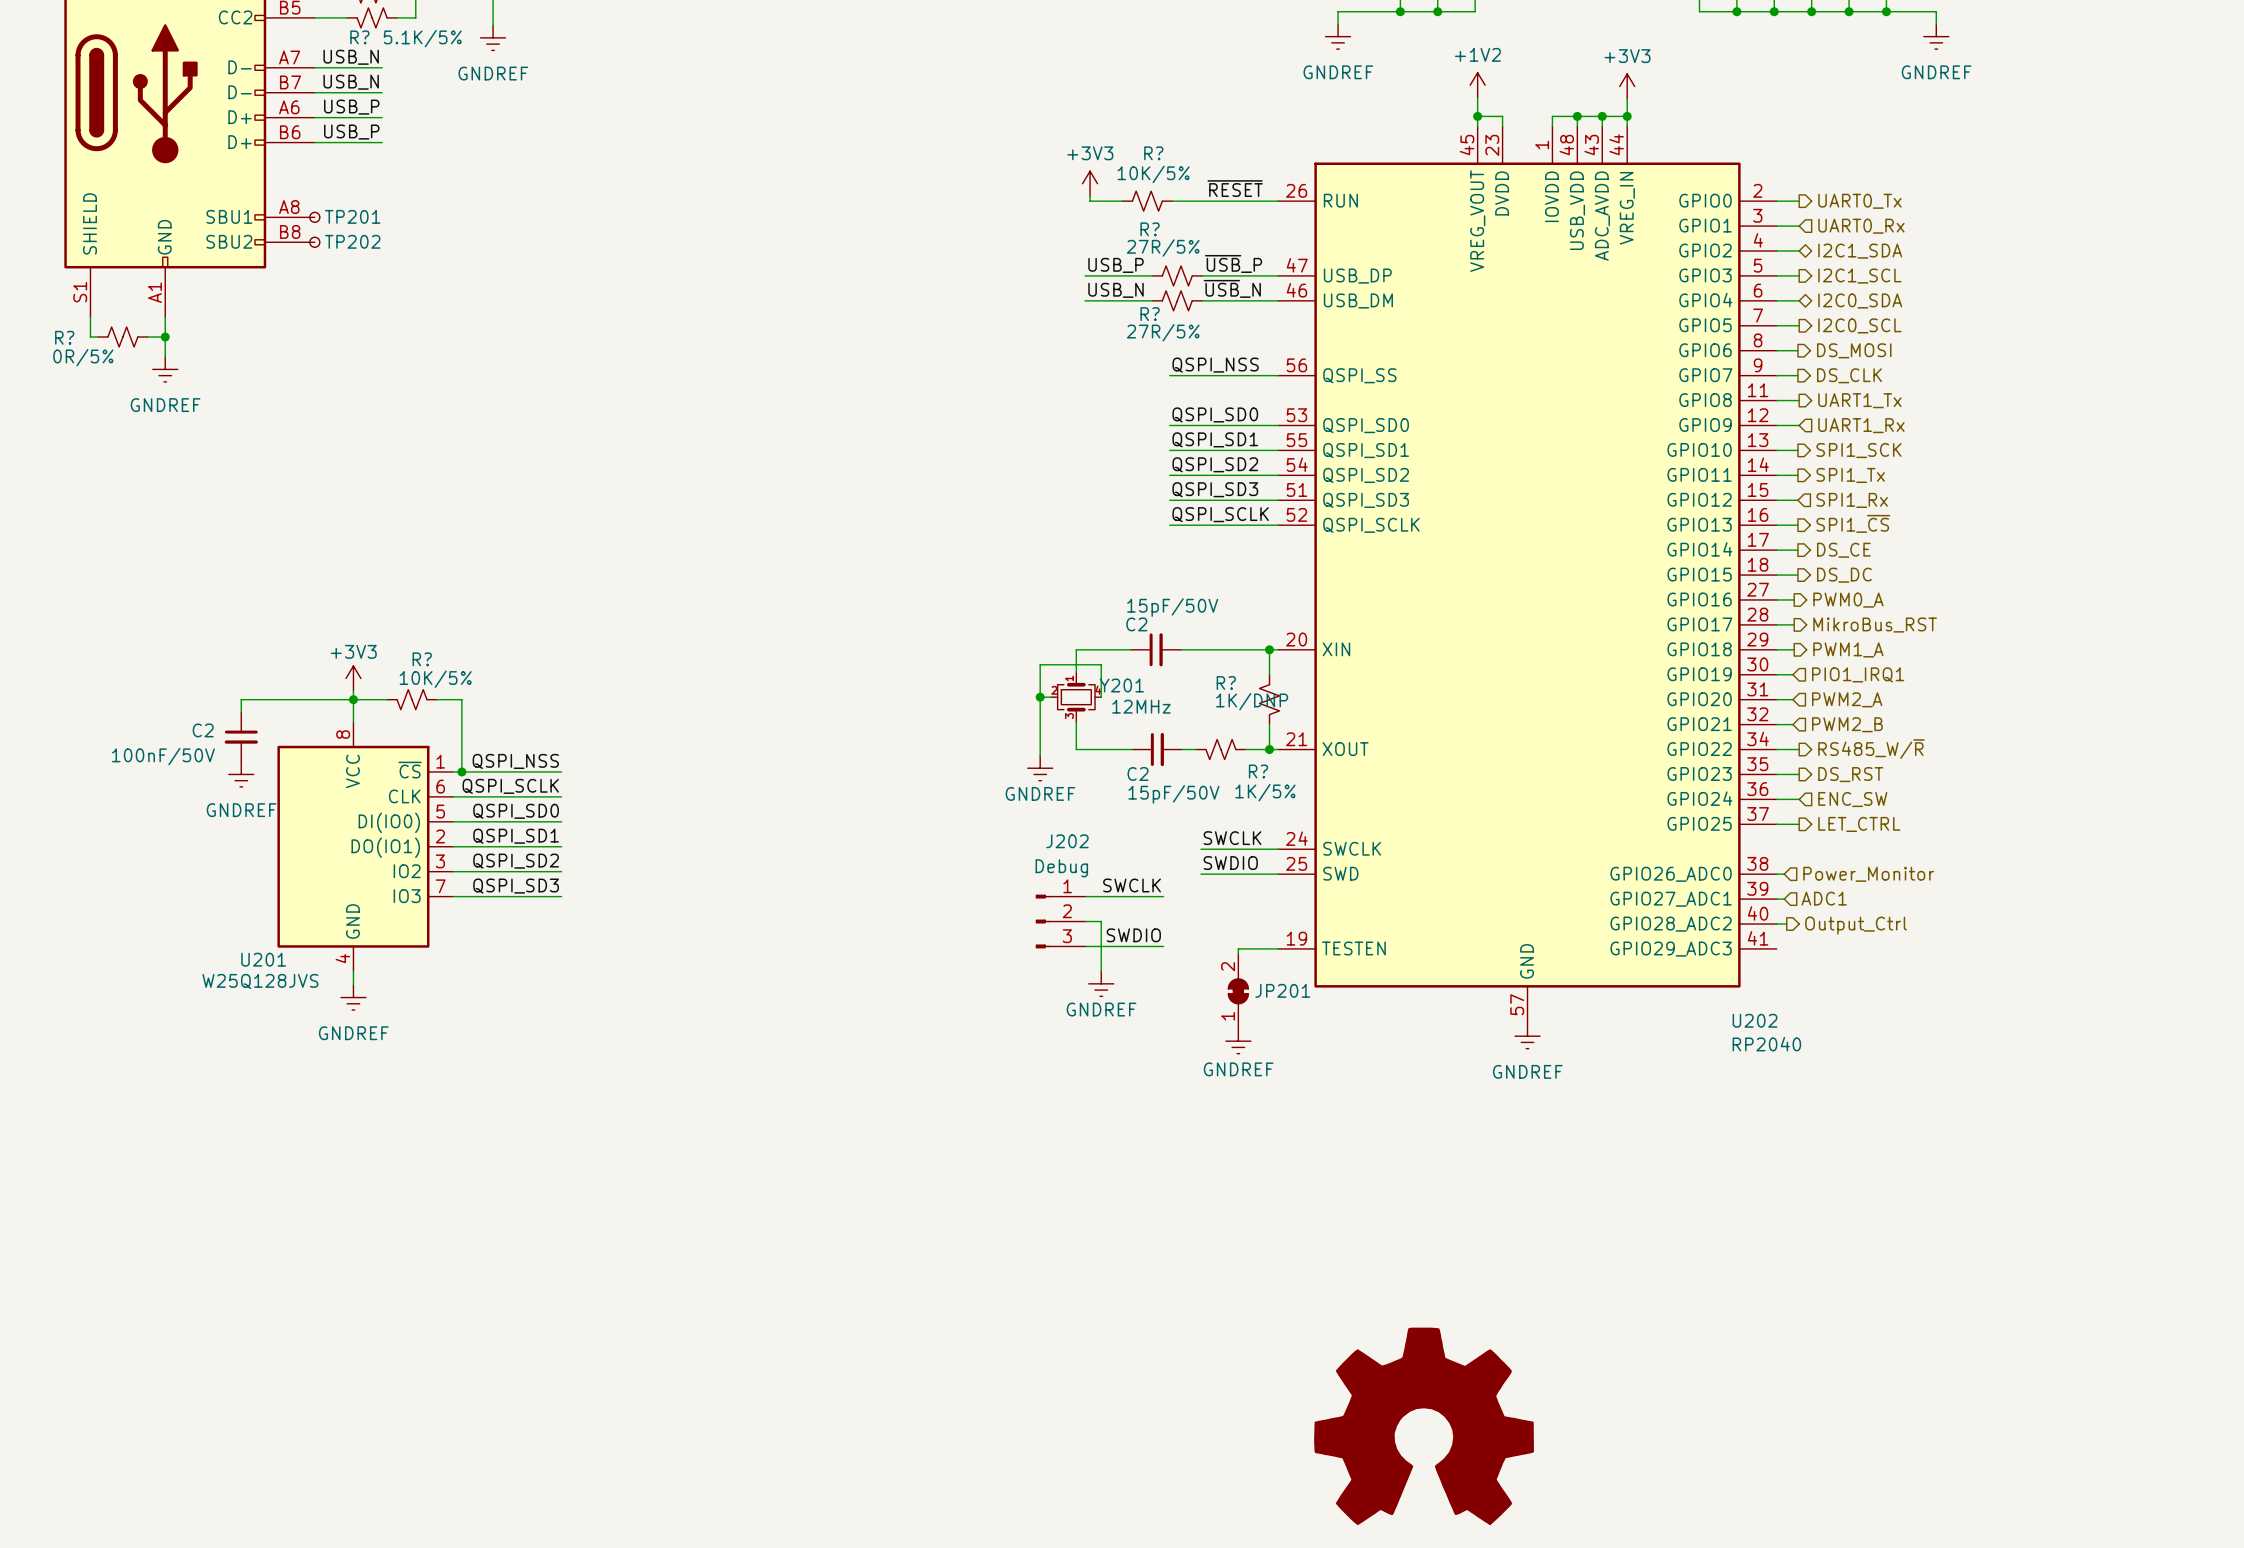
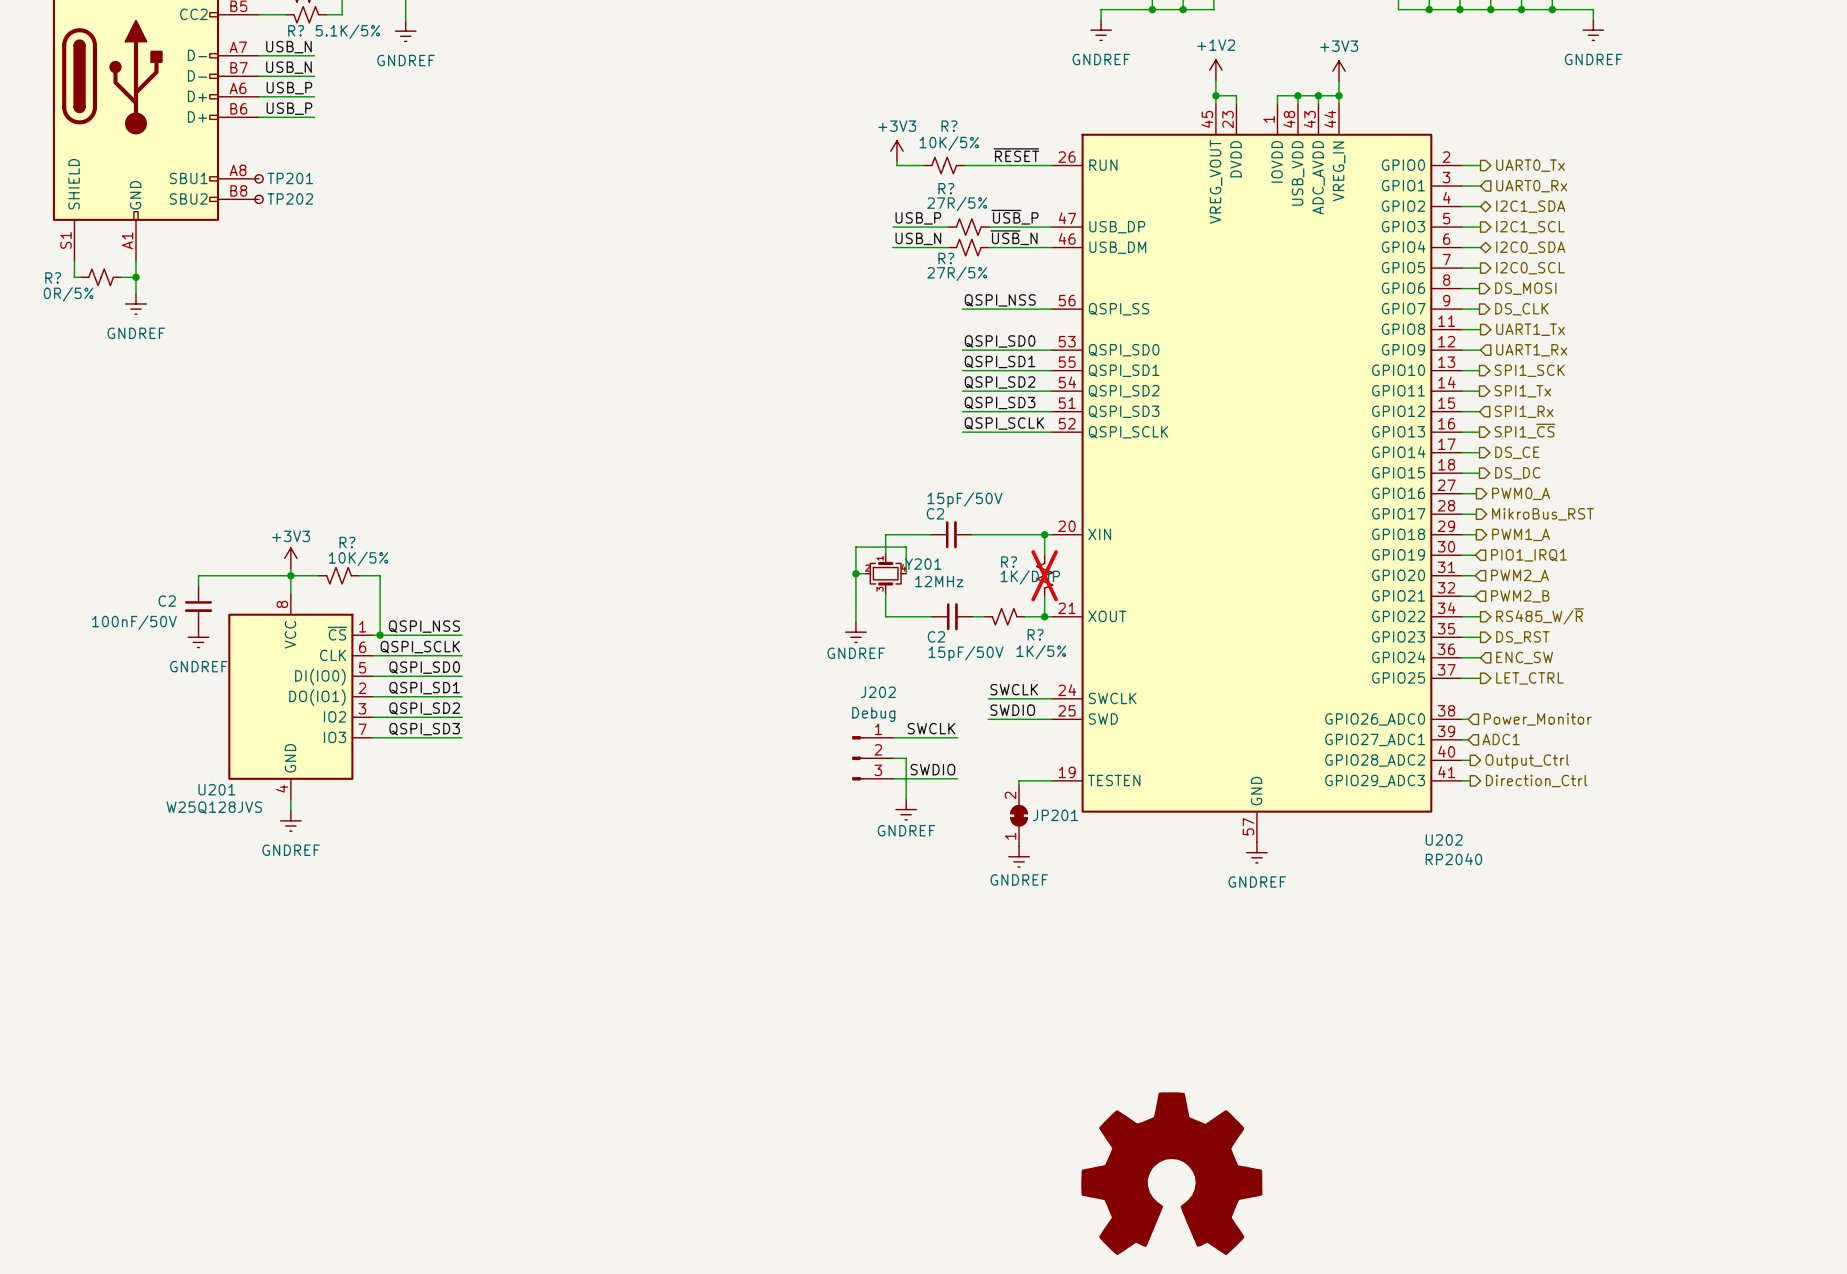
R? do-not-place cross: none -> (1044, 575)
wire: none -> (1462, 780) (1470, 780)
hierarchical label: none -> Direction_Ctrl (1536, 780)

